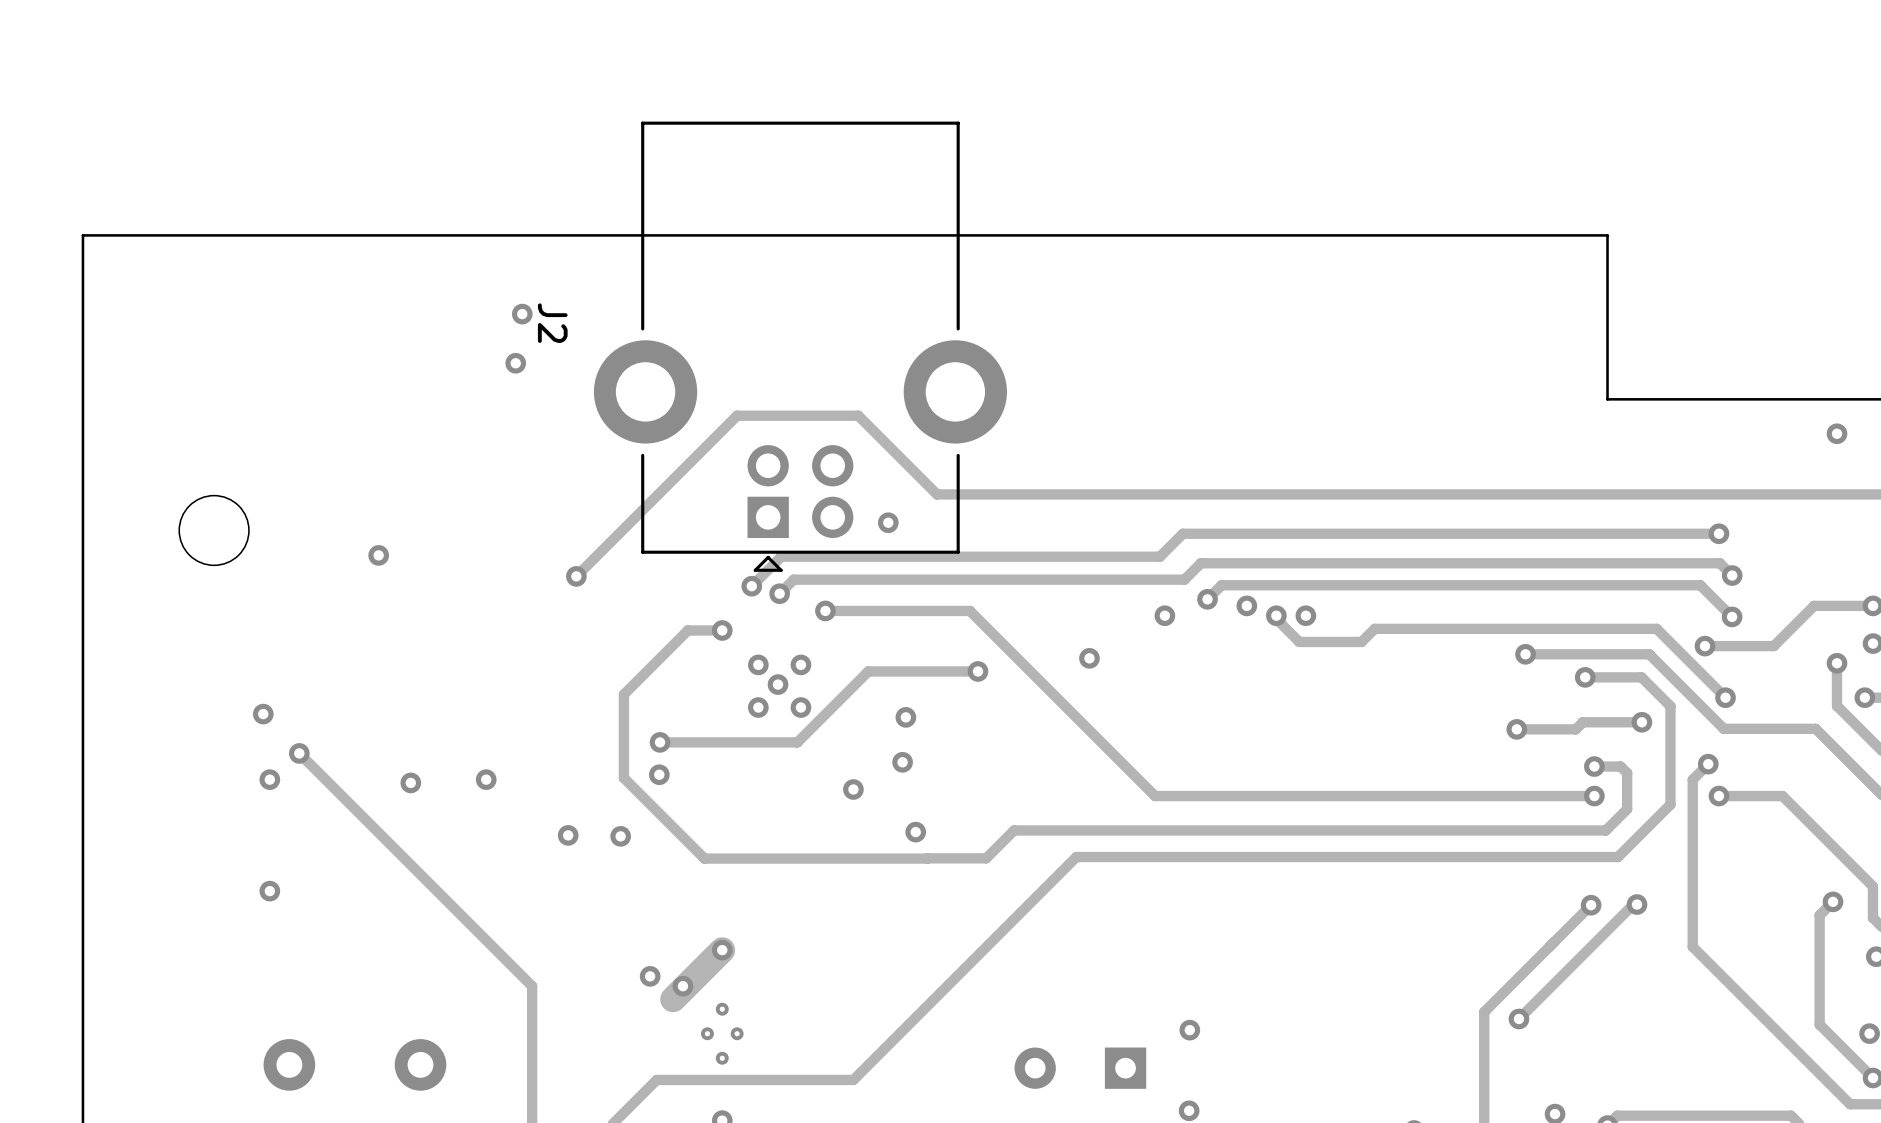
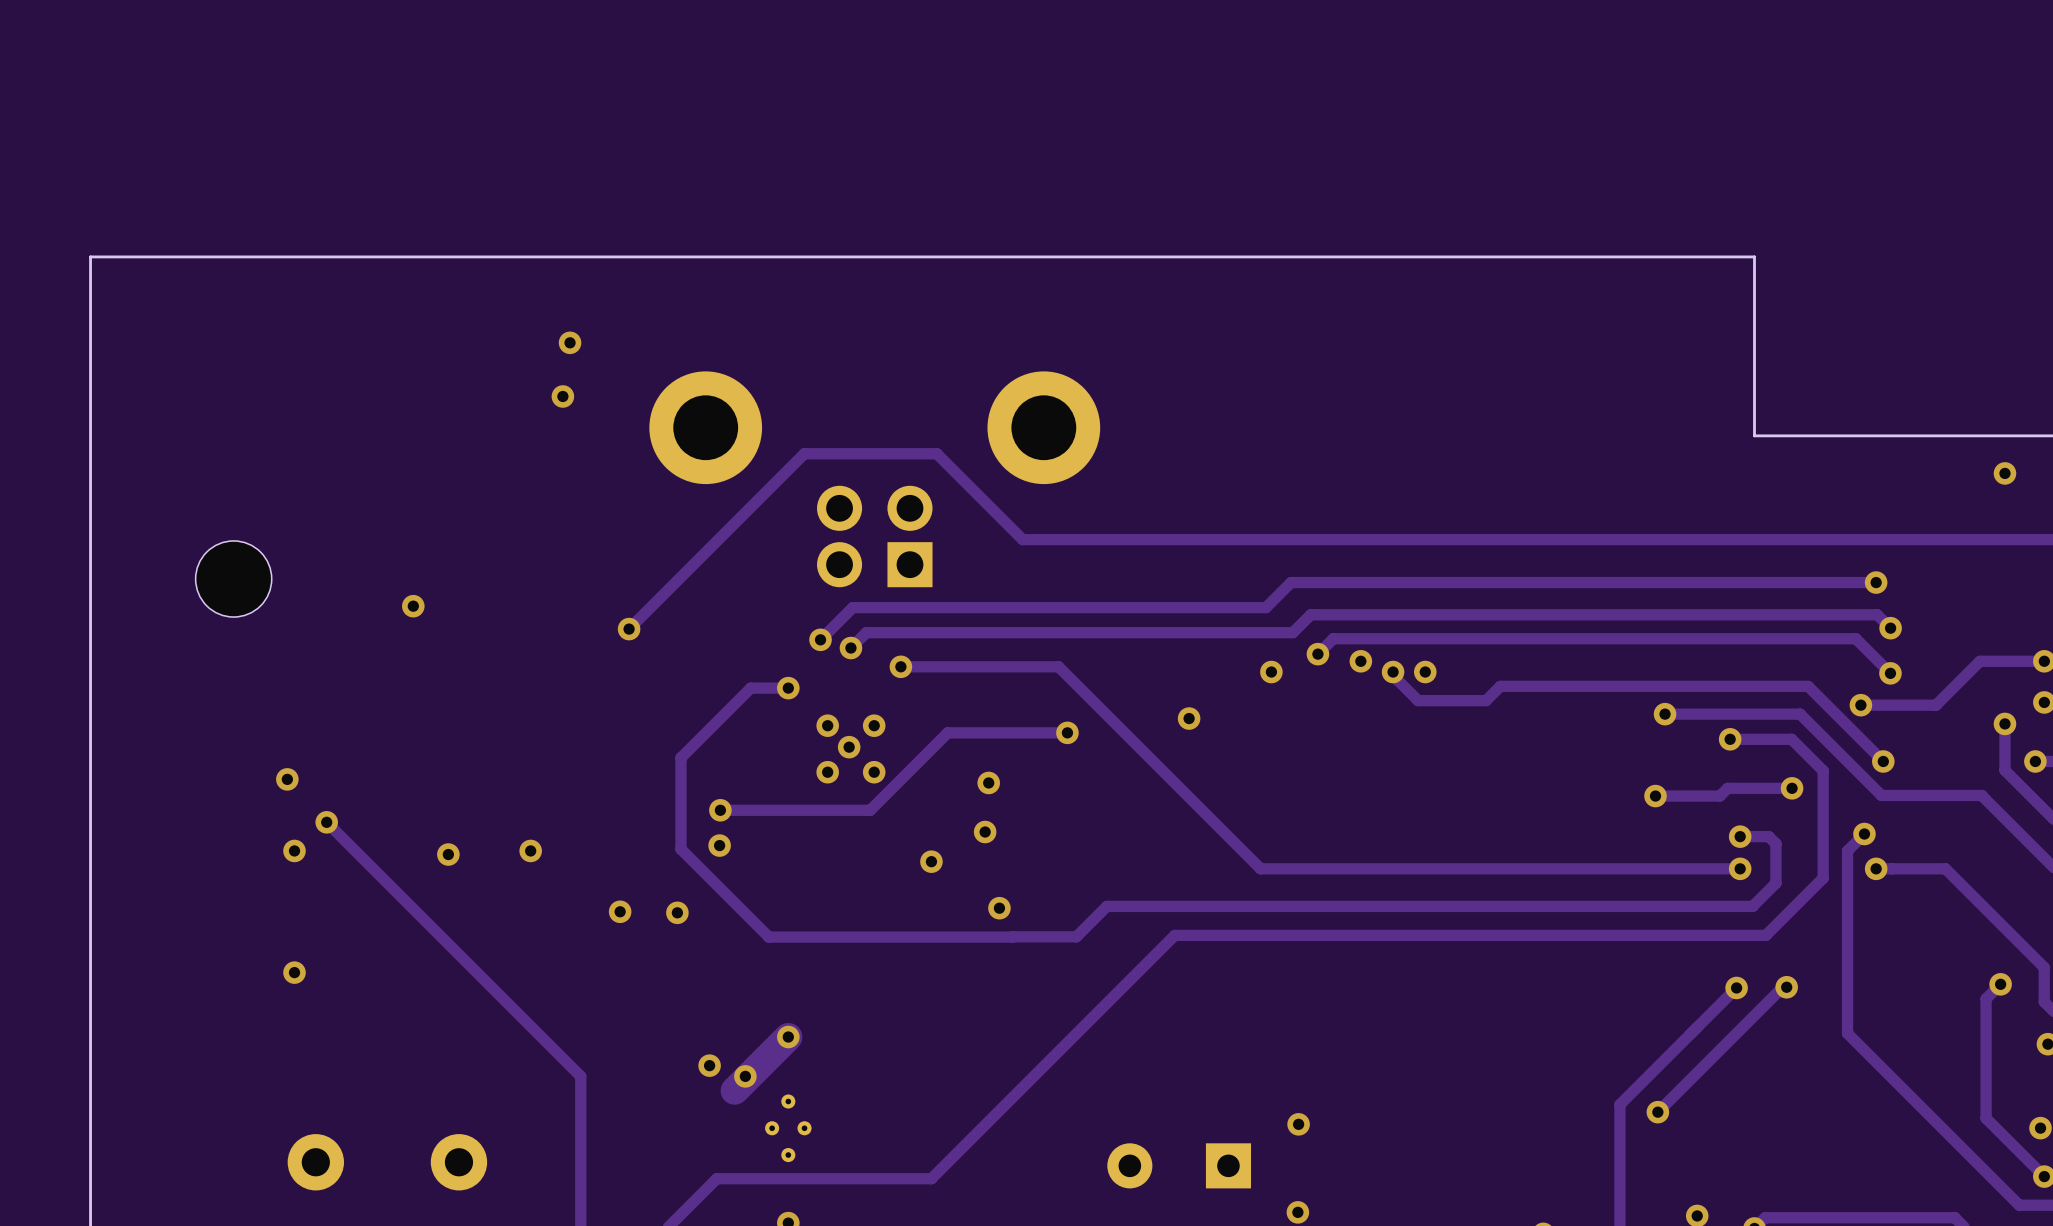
J2 side: bottom (800, 346) -> top (874, 479)
via: (888, 522) -> none

